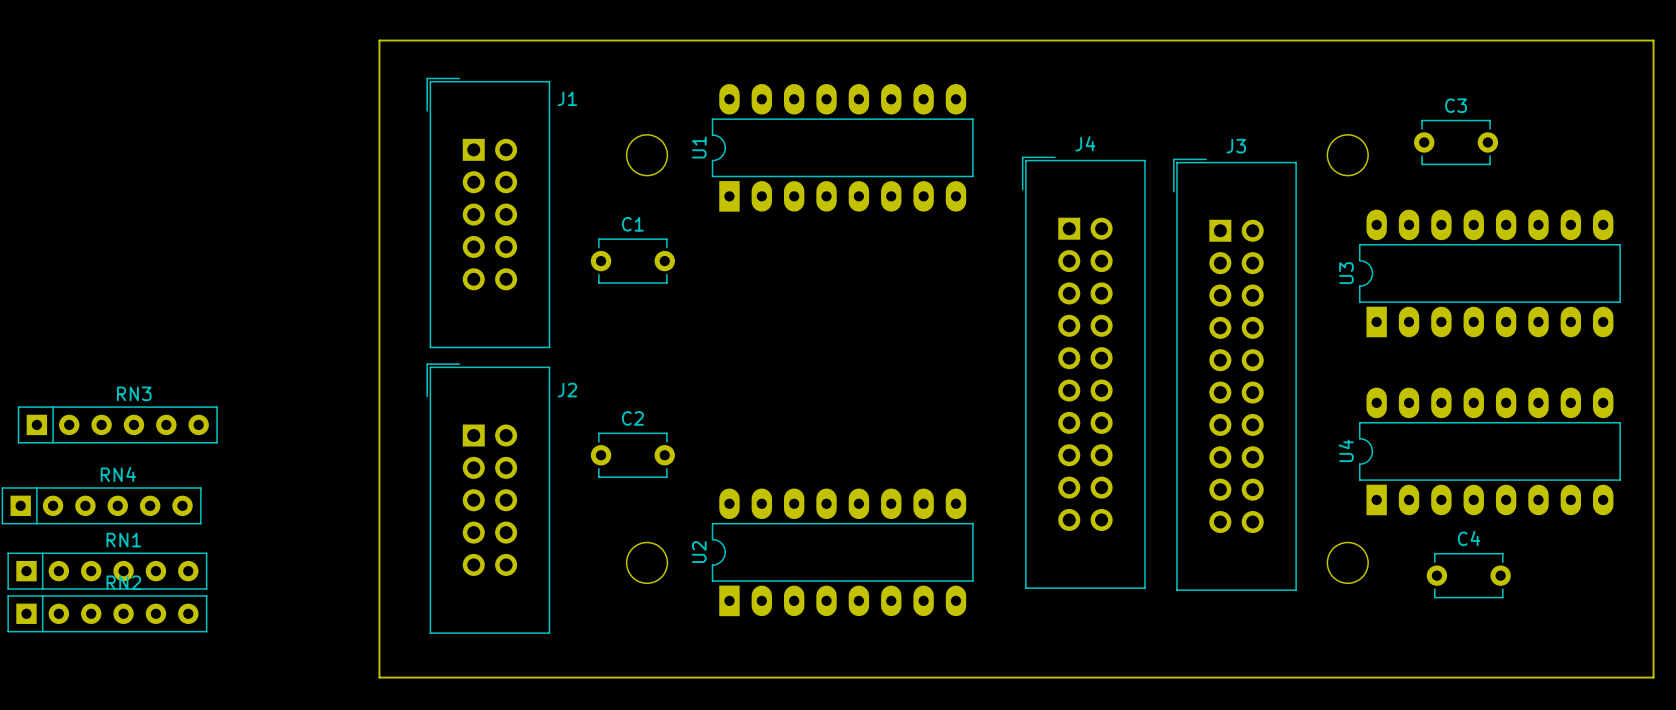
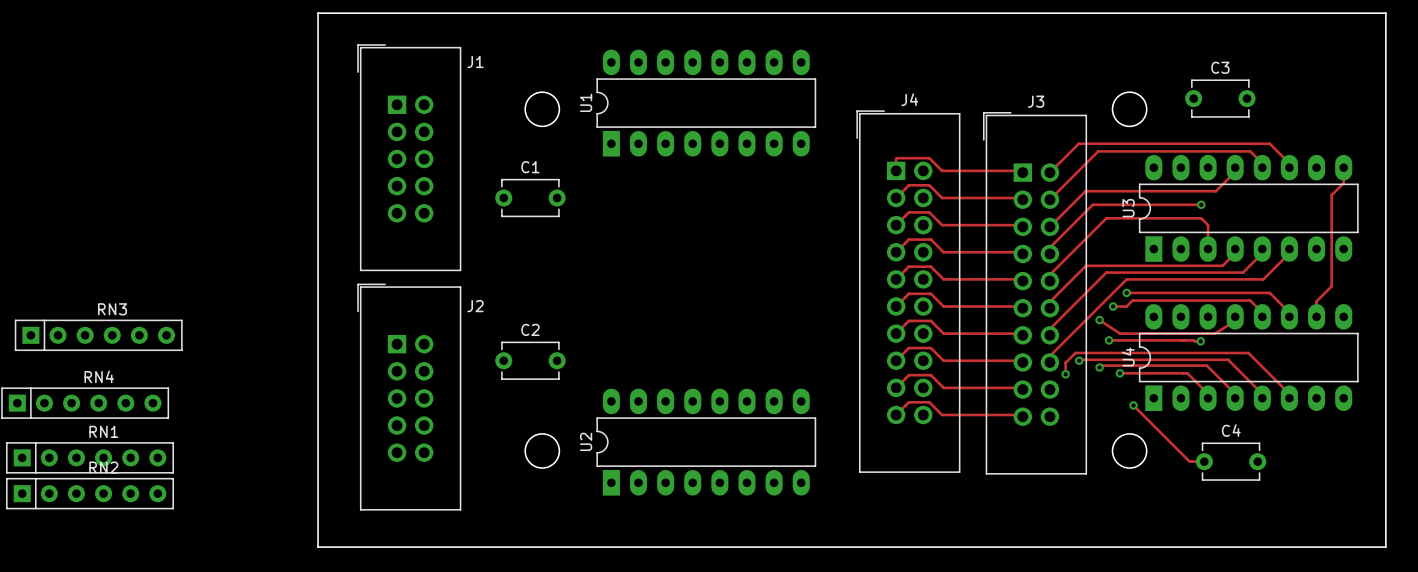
track: none -> (1235, 167) (1235, 171) (1215, 191) (1085, 191) (1049, 226)
track: none -> (1262, 167) (1262, 163) (1250, 151) (1098, 151) (1049, 199)
track: none -> (1289, 167) (1289, 163) (1269, 143) (1078, 143) (1049, 172)
track: none -> (1343, 167) (1343, 183) (1331, 195) (1331, 286) (1316, 301) (1316, 316)
track: none -> (896, 170) (896, 158) (929, 158) (942, 170) (1018, 170)
track: none -> (896, 198) (908, 185) (929, 185) (942, 198) (1018, 198)
track: none -> (1201, 204) (1092, 204) (1045, 252)
via: none -> (1201, 204)
track: none -> (896, 225) (908, 212) (929, 212) (942, 225) (1018, 225)
track: none -> (1208, 249) (1208, 225) (1201, 218) (1106, 218) (1045, 279)
track: none -> (1235, 249) (1235, 253) (1222, 265) (1086, 265) (1045, 306)
track: none -> (1262, 249) (1262, 253) (1243, 272) (1106, 272) (1045, 333)
track: none -> (1289, 249) (1289, 253) (1263, 279) (1126, 279) (1045, 360)
track: none -> (896, 252) (908, 239) (930, 239) (943, 252) (1018, 252)
track: none -> (896, 279) (908, 266) (930, 266) (943, 279) (1018, 279)
track: none -> (1126, 292) (1269, 292) (1289, 312) (1289, 316)
via: none -> (1126, 292)
track: none -> (896, 306) (908, 293) (930, 293) (943, 306) (1018, 306)
track: none -> (1113, 306) (1126, 306) (1132, 300) (1250, 300) (1262, 312) (1262, 316)
via: none -> (1113, 306)
track: none -> (1235, 316) (1235, 321) (1214, 333) (1119, 333) (1099, 320)
via: none -> (1099, 320)
track: none -> (896, 333) (908, 320) (930, 320) (943, 333) (1018, 333)
track: none -> (1109, 340) (1200, 341)
via: none -> (1109, 340)
via: none -> (1200, 341)
track: none -> (896, 360) (908, 348) (930, 348) (943, 360) (1018, 360)
track: none -> (1079, 360) (1228, 359) (1262, 393) (1262, 398)
via: none -> (1079, 360)
track: none -> (1099, 367) (1101, 365) (1206, 365) (1235, 393) (1235, 398)
via: none -> (1099, 367)
track: none -> (1119, 373) (1187, 373) (1208, 393) (1208, 398)
via: none -> (1119, 373)
track: none -> (1065, 374) (1065, 362) (1075, 353) (1248, 353) (1289, 393) (1289, 398)
via: none -> (1065, 374)
track: none -> (896, 387) (908, 375) (930, 375) (943, 387) (1018, 387)
track: none -> (1133, 405) (1189, 461) (1204, 461)
via: none -> (1133, 405)
track: none -> (896, 414) (908, 402) (929, 402) (942, 414) (1018, 414)

